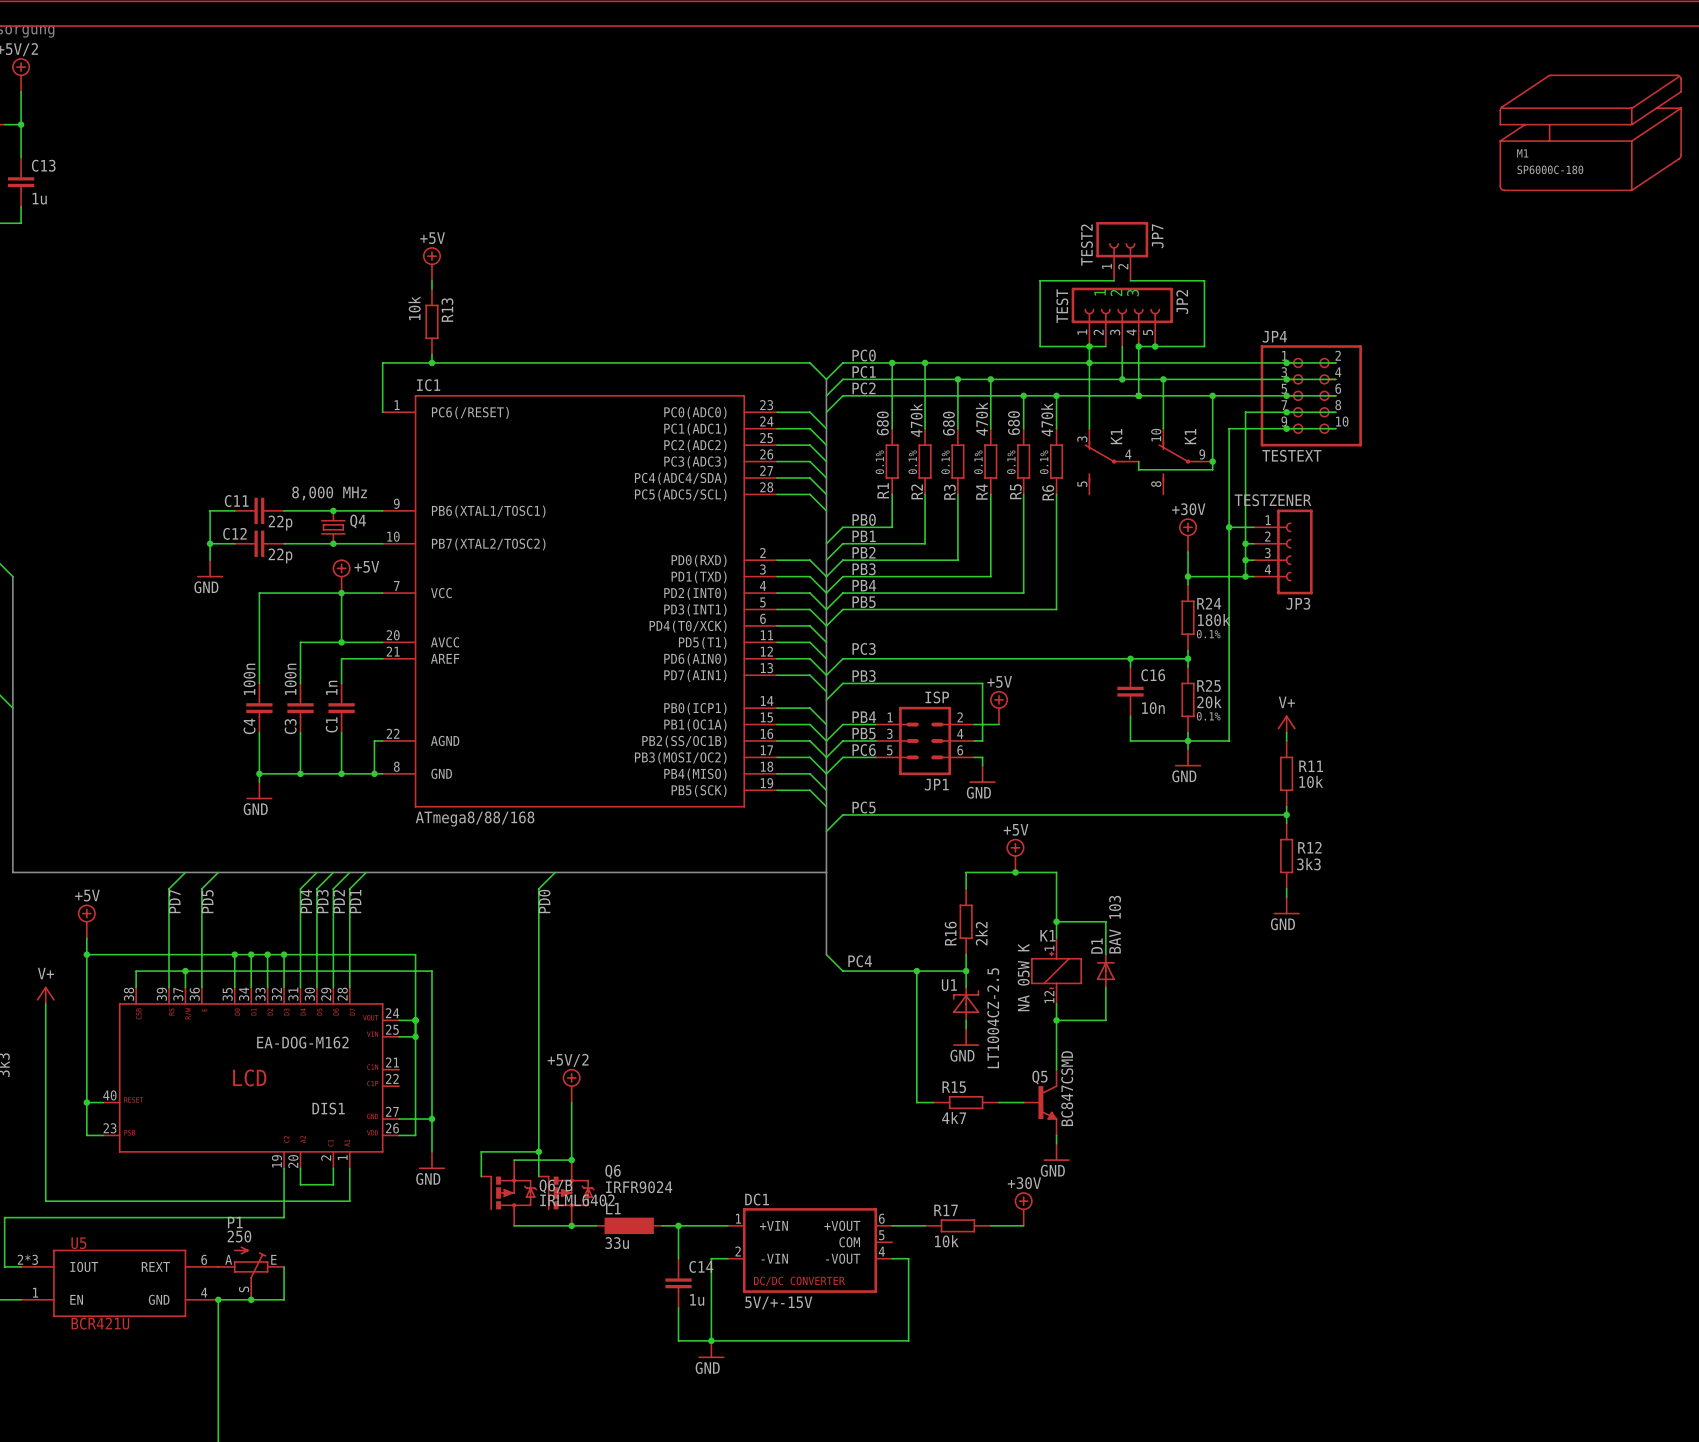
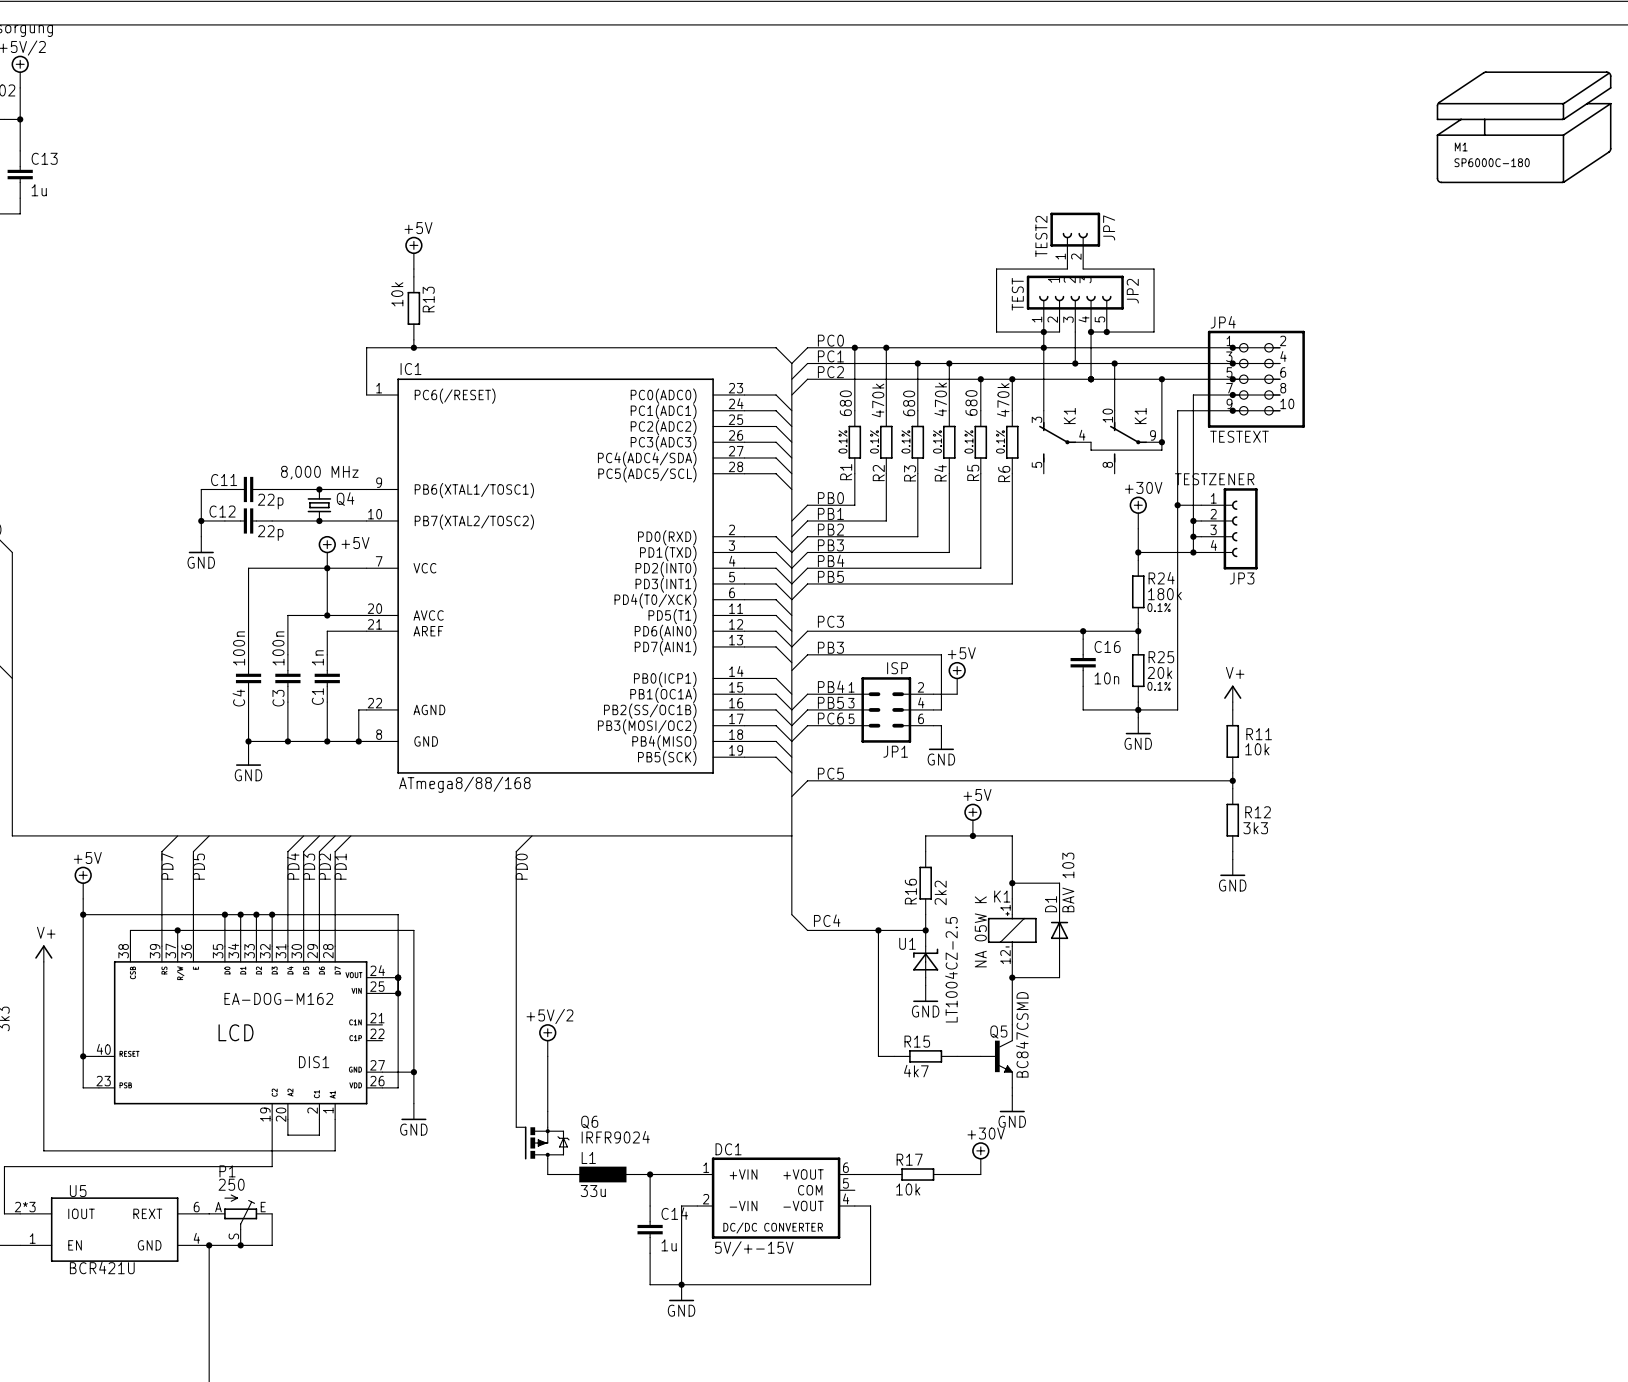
wire: (538, 1151) (481, 1151) (481, 1176) -> none
junction: (538, 1151) -> none
wire: (514, 1160) (571, 1160) -> none
junction: (571, 1160) -> none
Q6/B: IRLML6402 (508, 1192) -> none
wire: (514, 1225) (571, 1225) -> none
junction: (571, 1225) -> none

